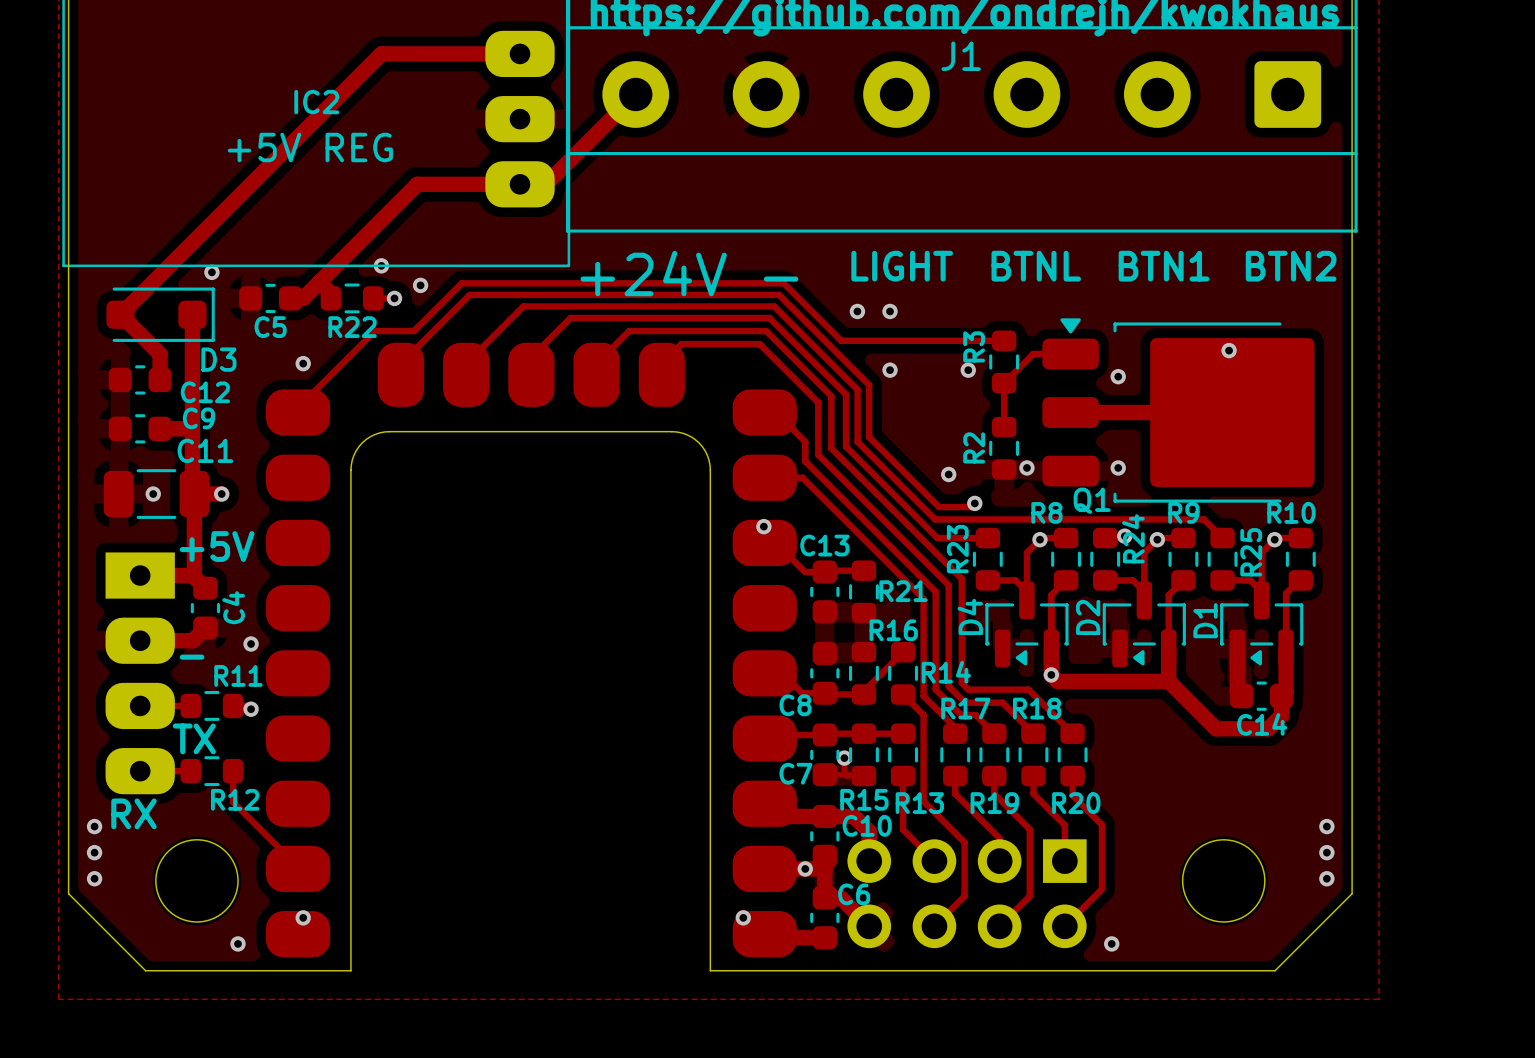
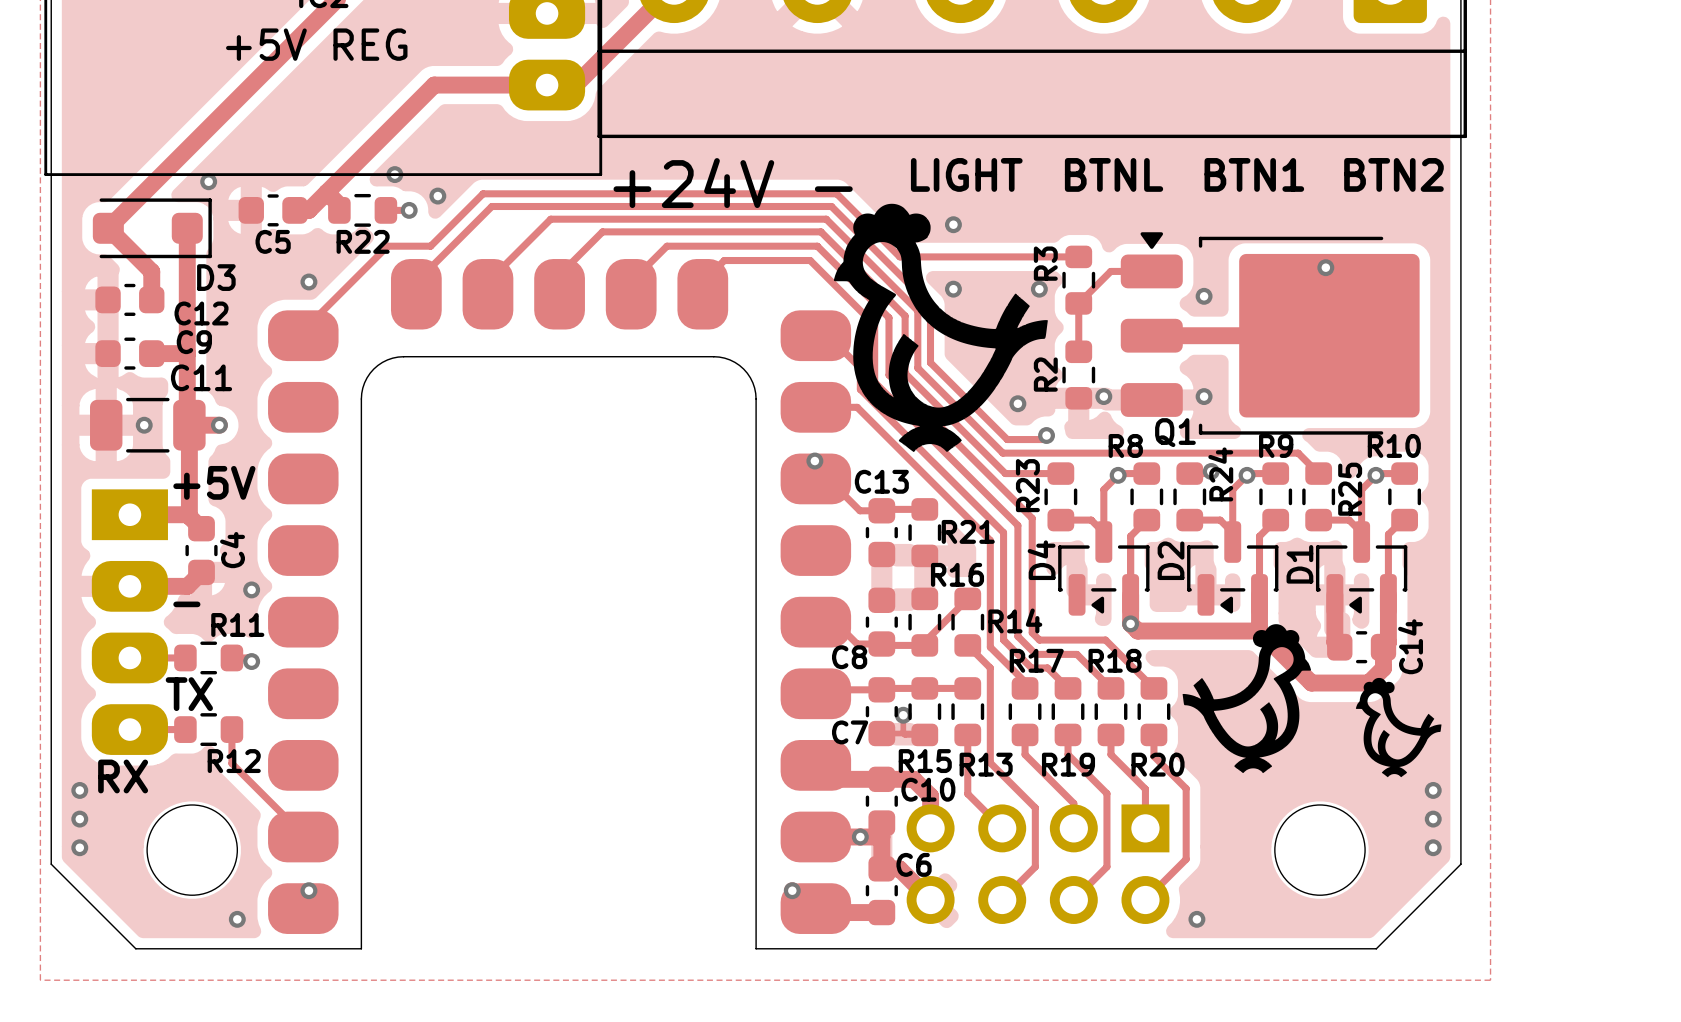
drawing: none -> [833, 203, 1048, 452]
drawing: none -> [1182, 624, 1311, 774]
drawing: none -> [1355, 677, 1442, 778]
C14 name rotation: 0° (1262, 724) -> 90° counterclockwise (1410, 646)

